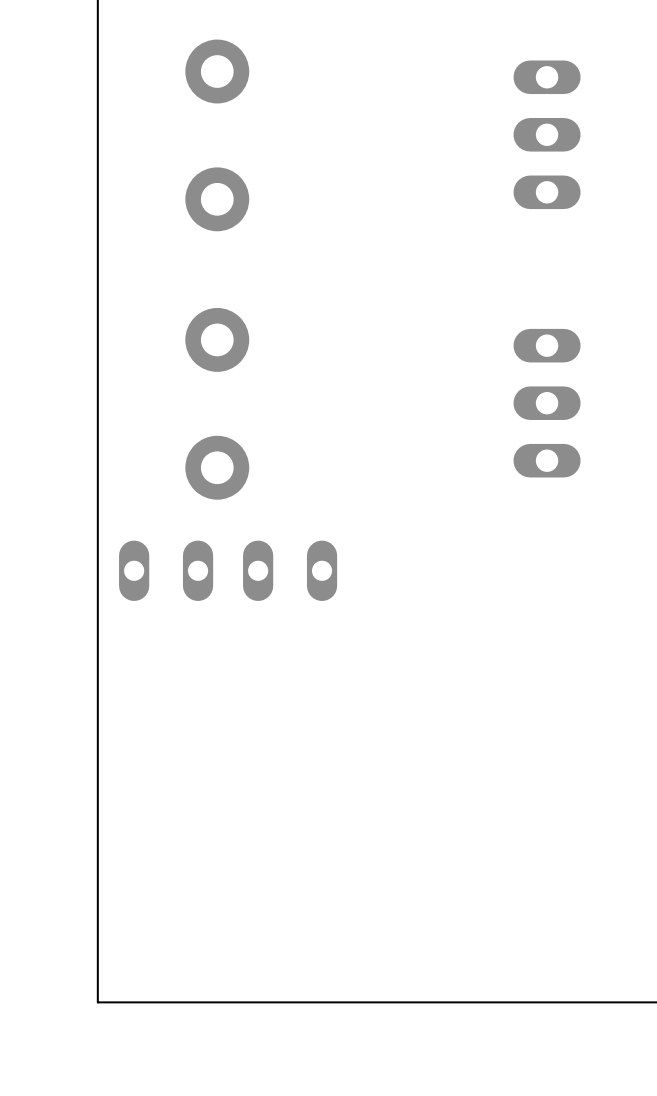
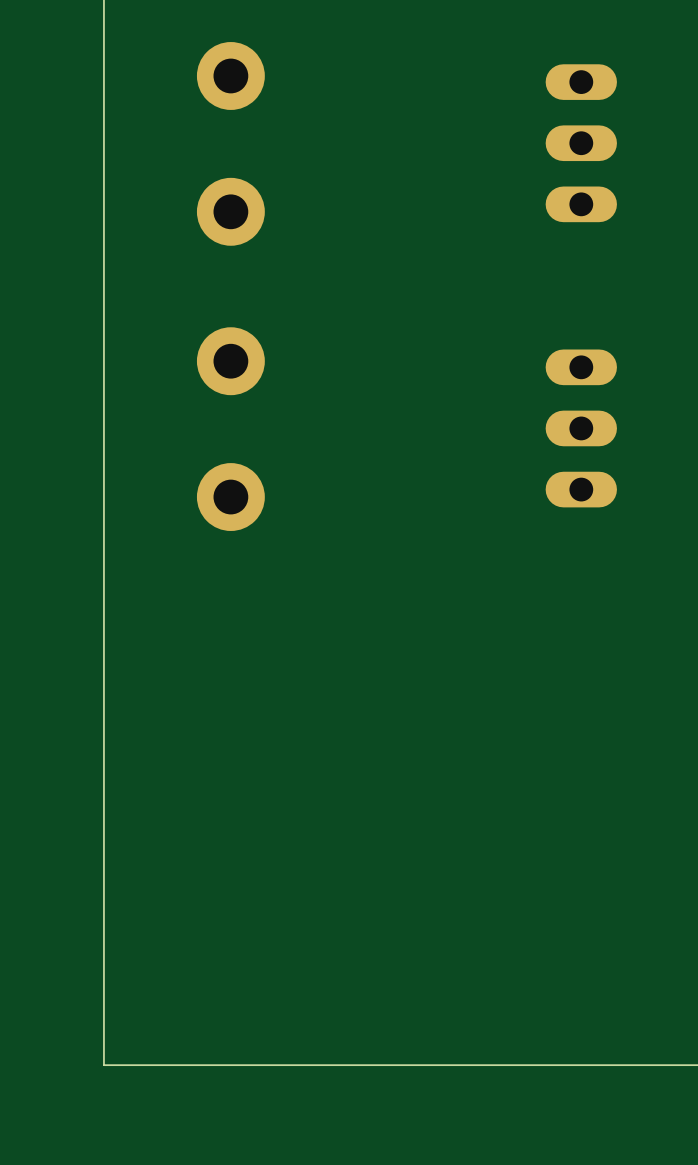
part: (166, 570) -> none
part: (290, 570) -> none

